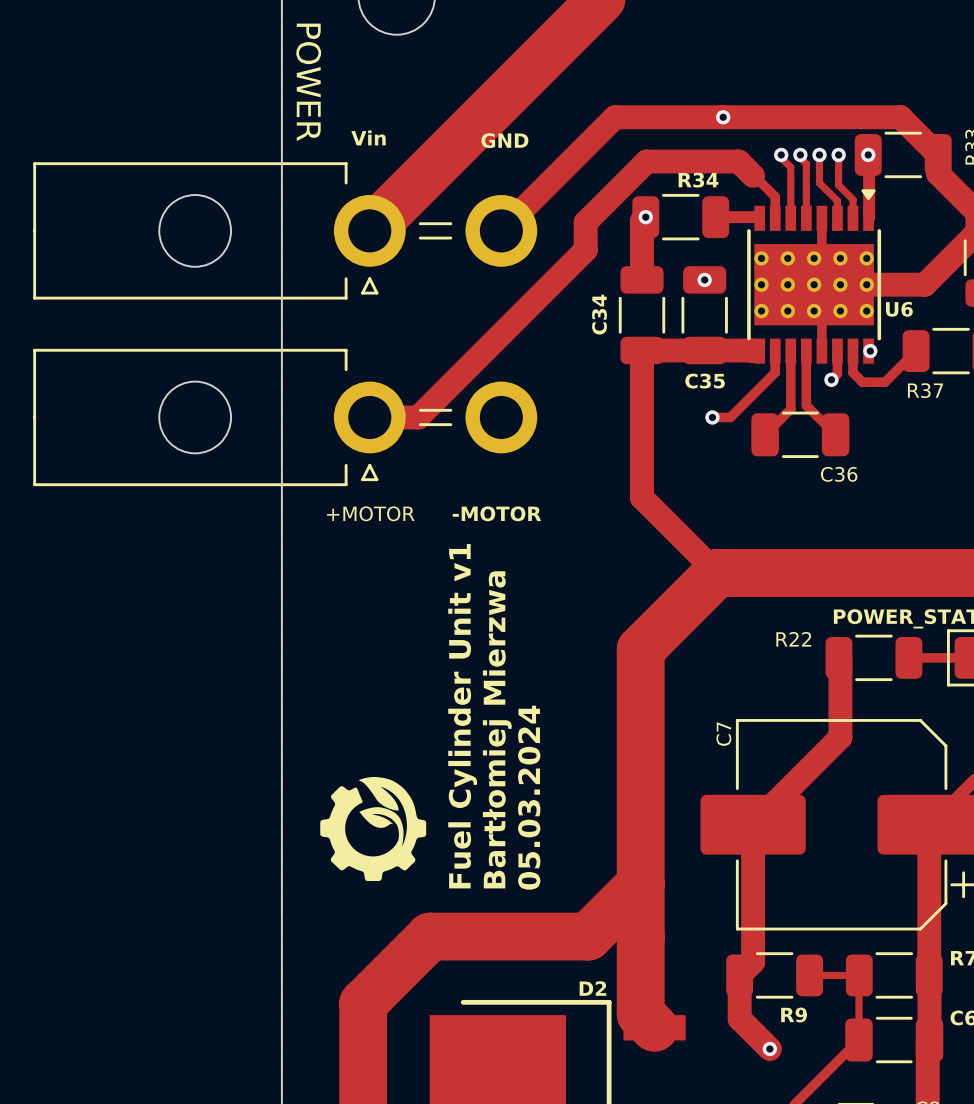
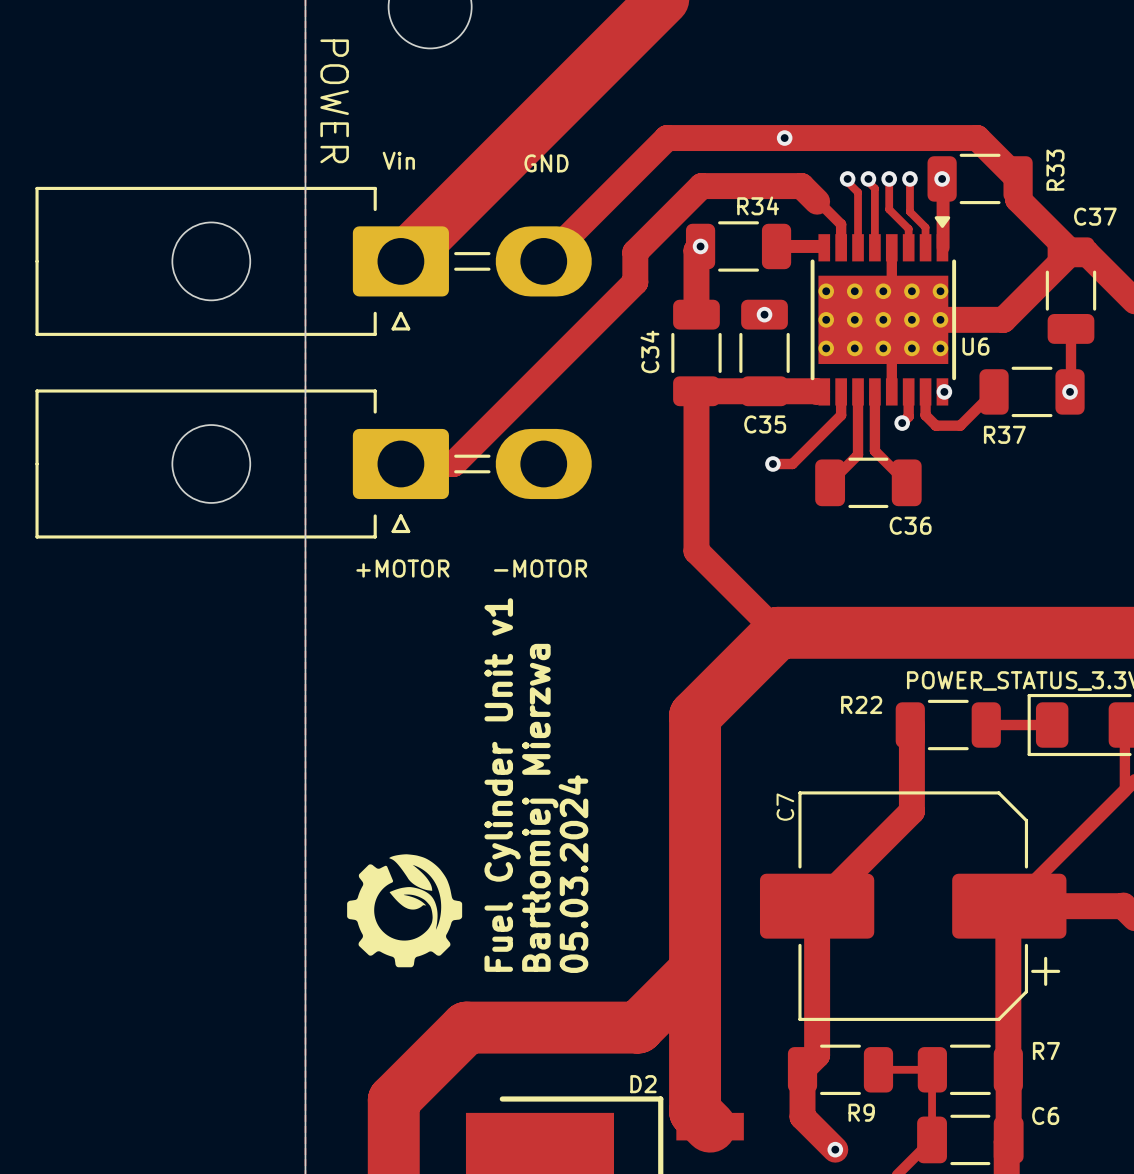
part footprint: [33, 162, 538, 300] -> [35, 186, 592, 336]
part footprint: [33, 348, 538, 487] -> [35, 389, 592, 539]

